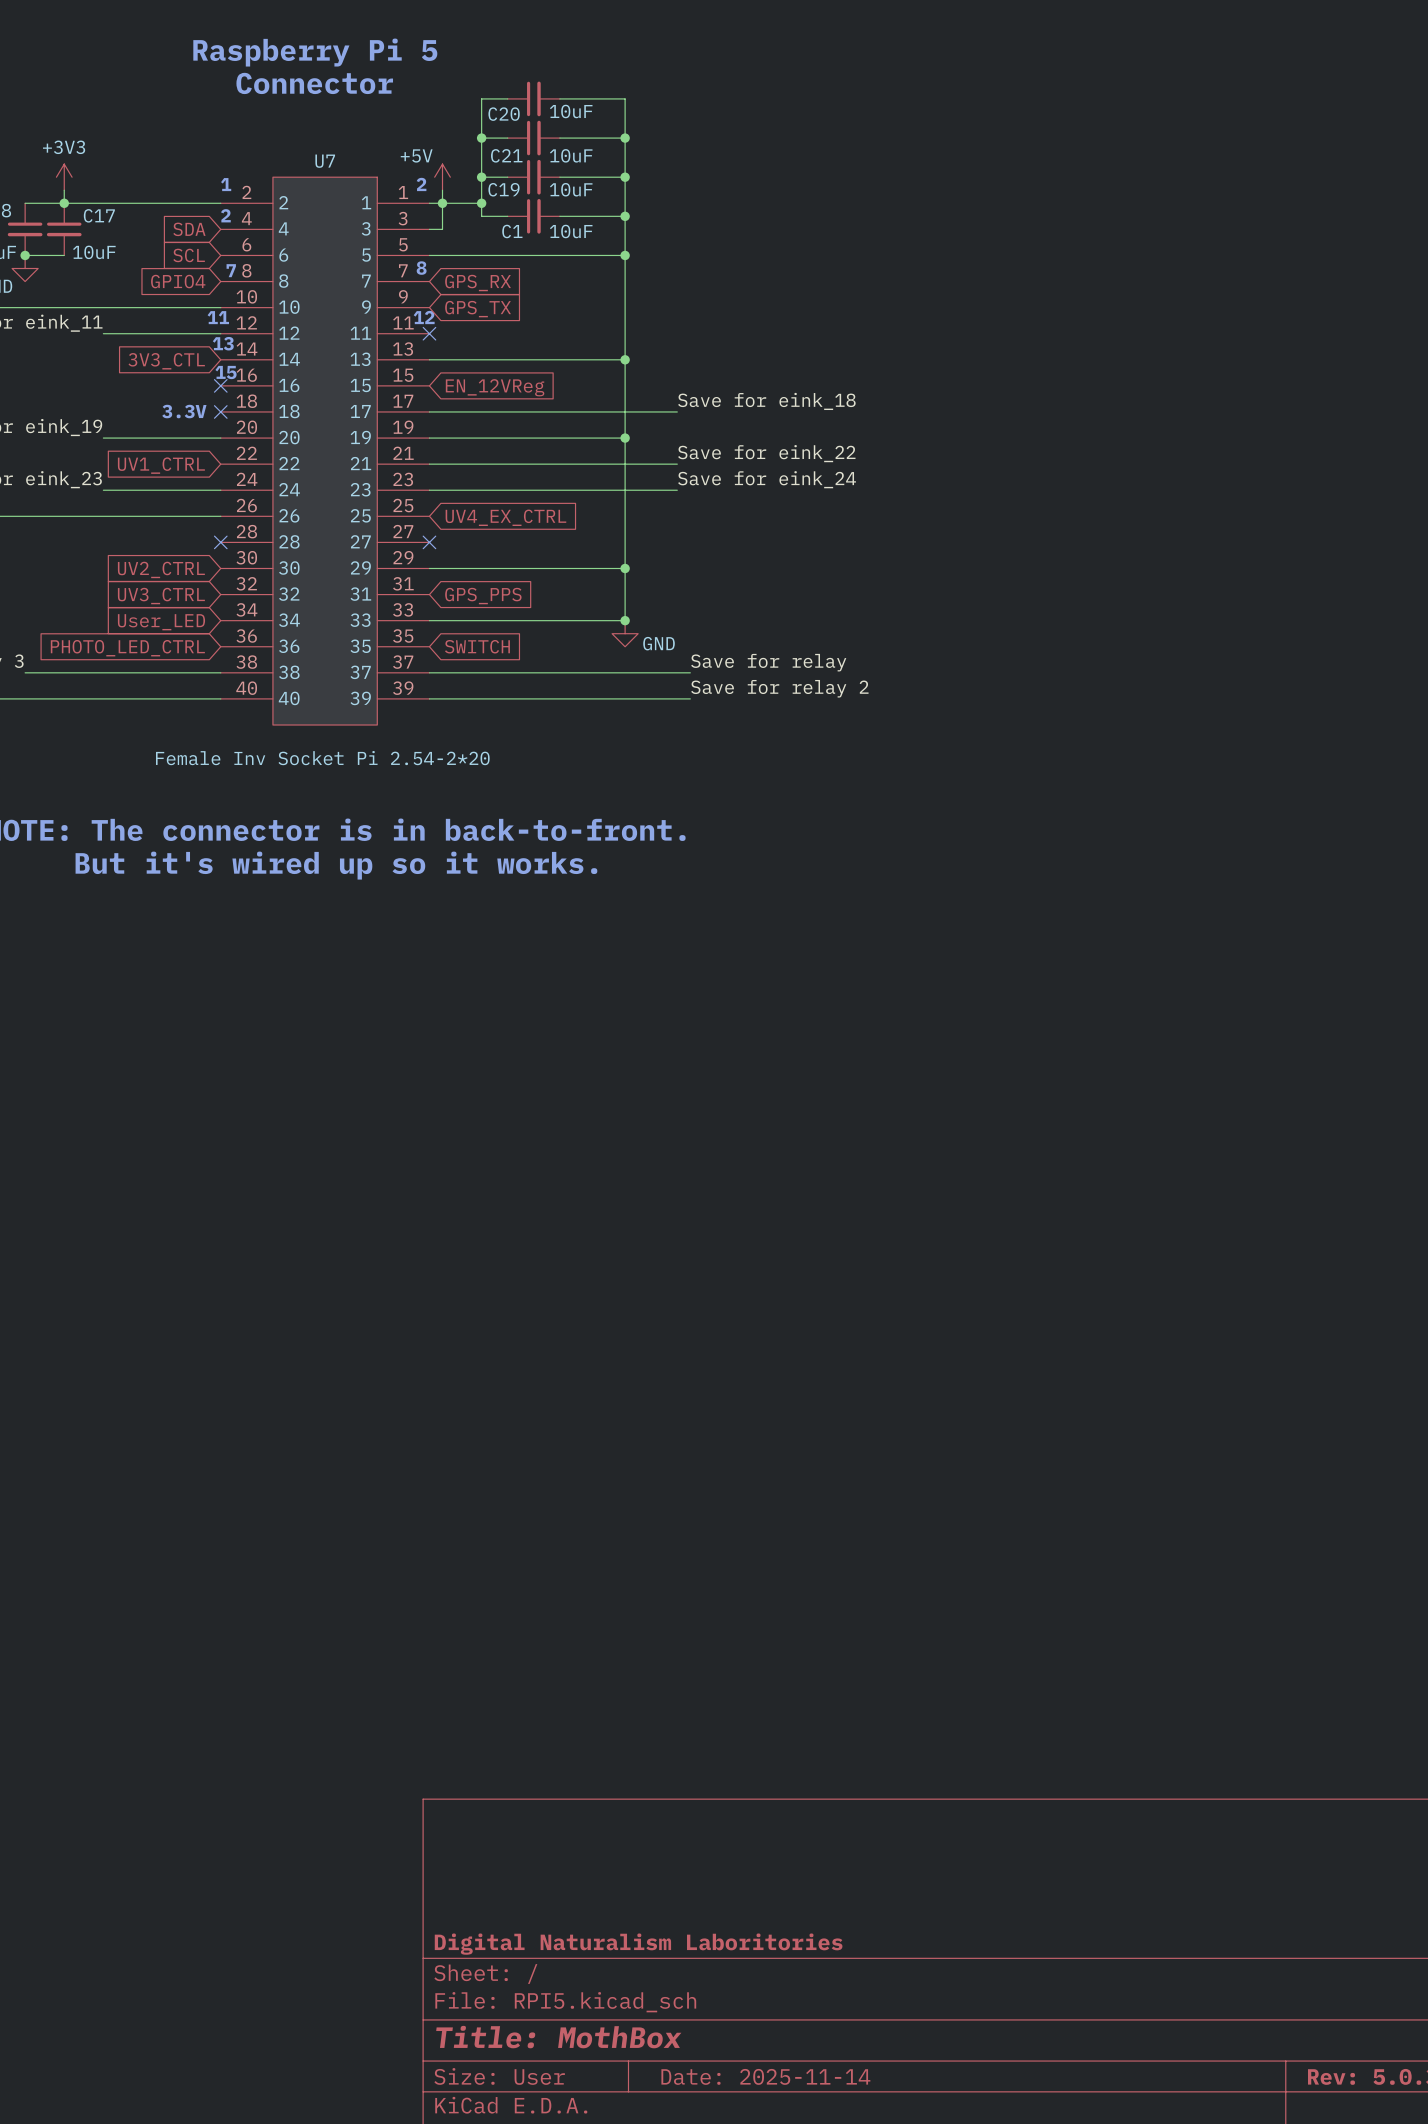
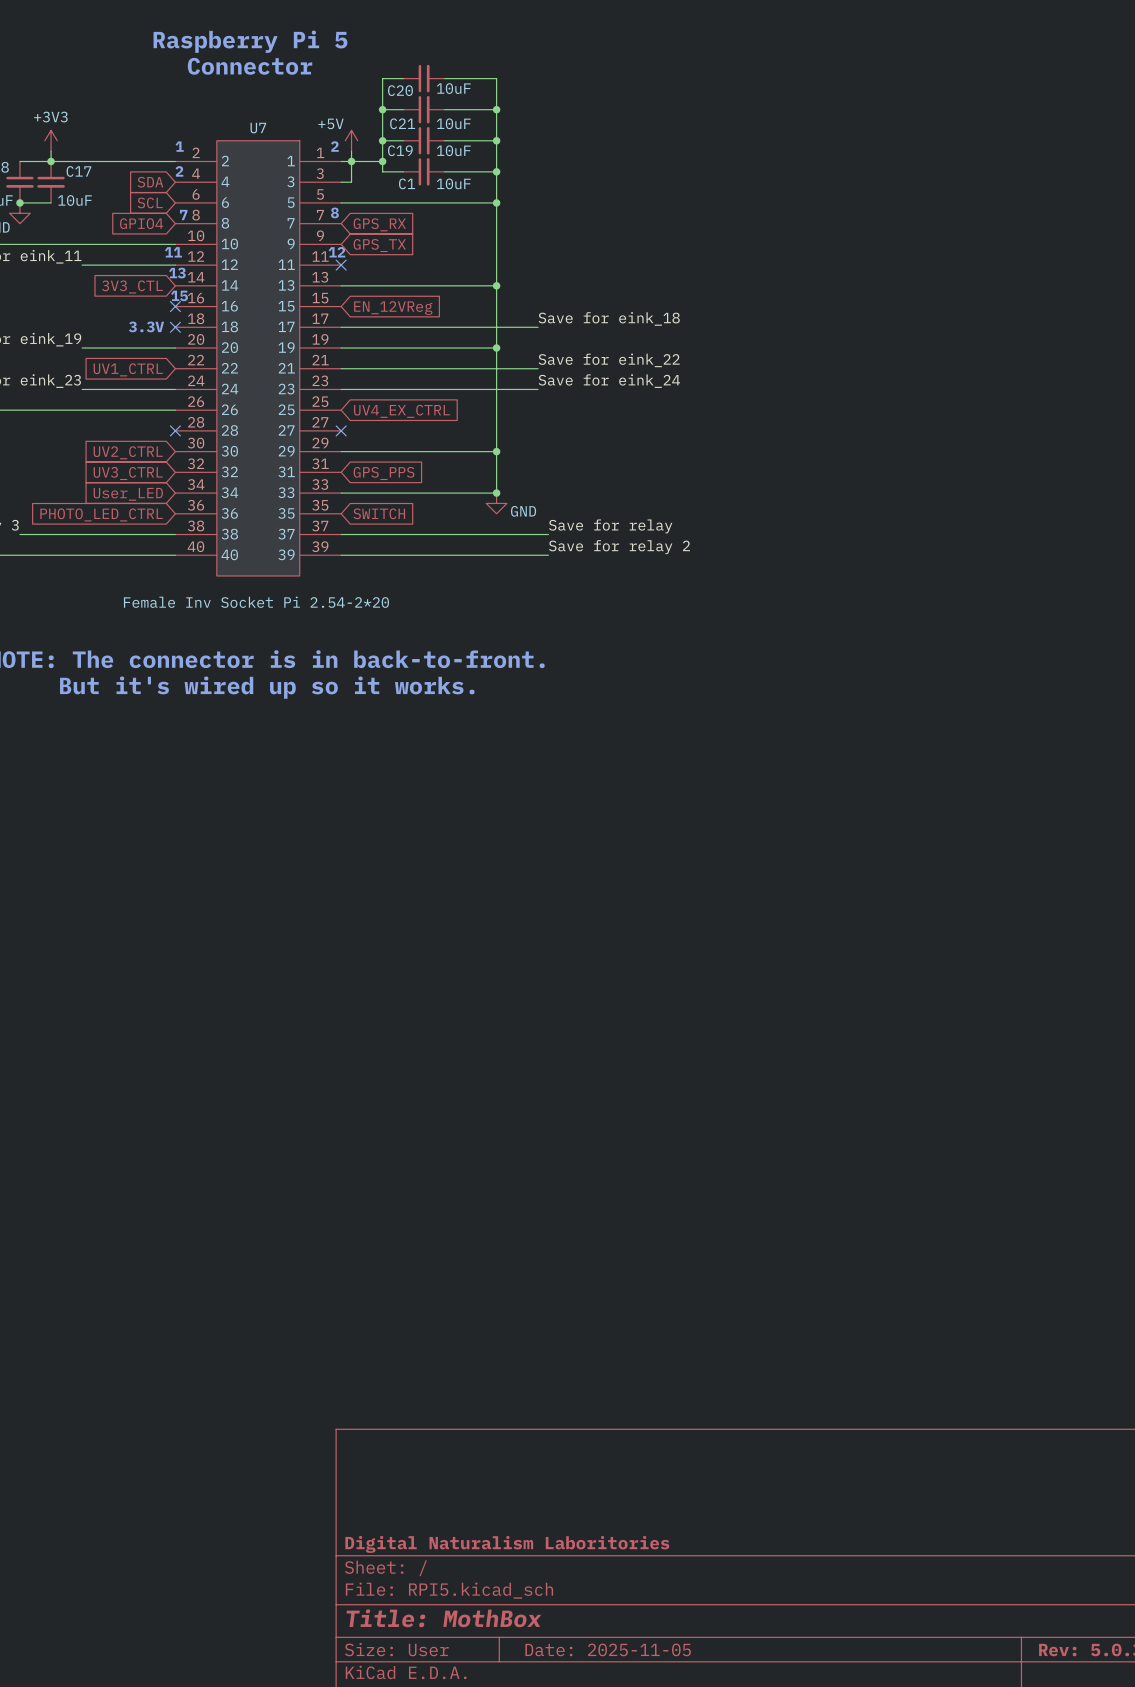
title block: Date: 2025-11-14 (765, 2076) -> Date: 2025-11-05 (608, 1649)

